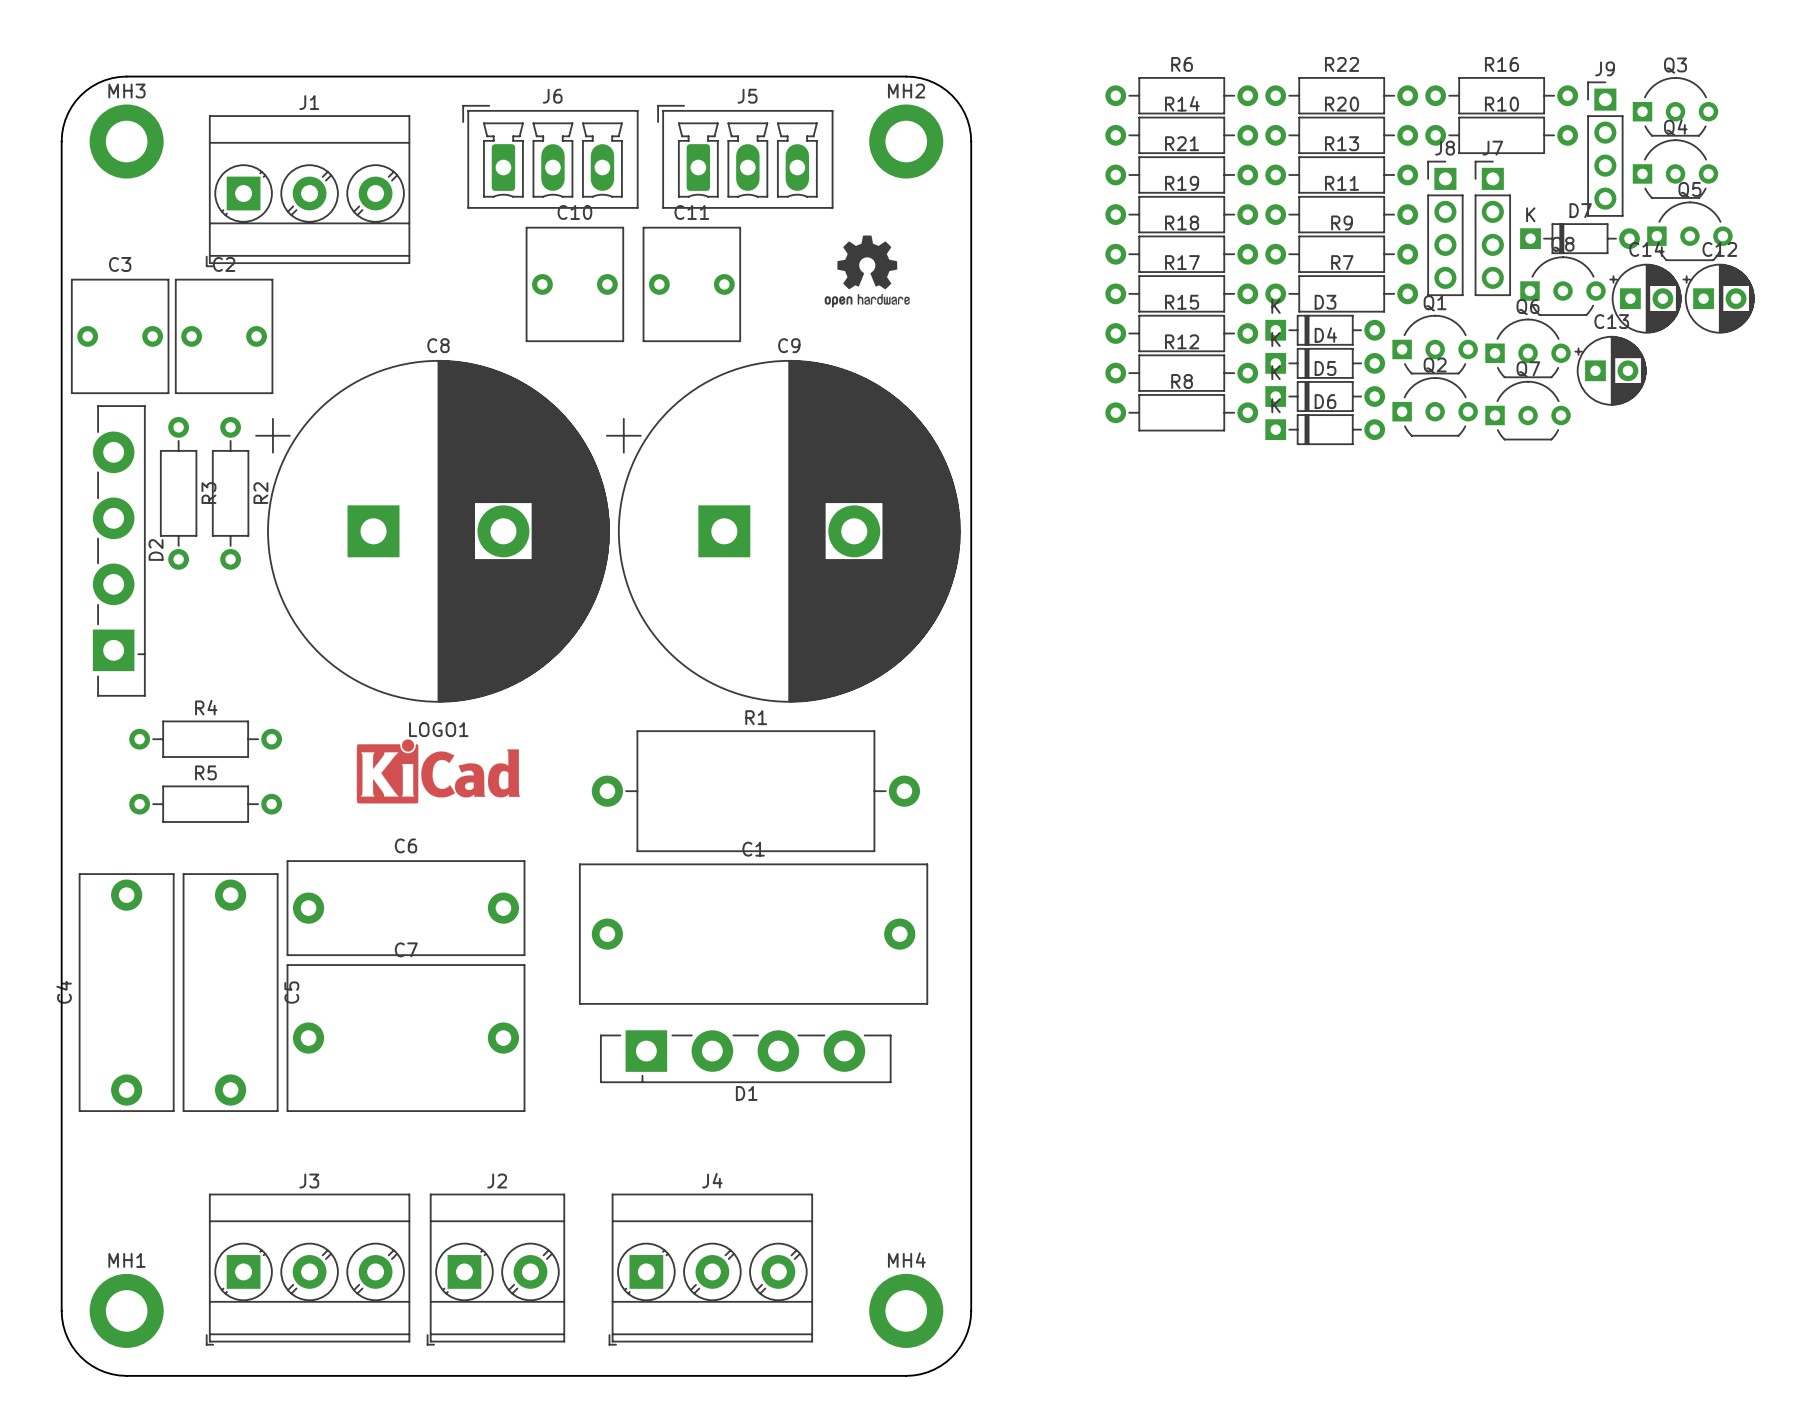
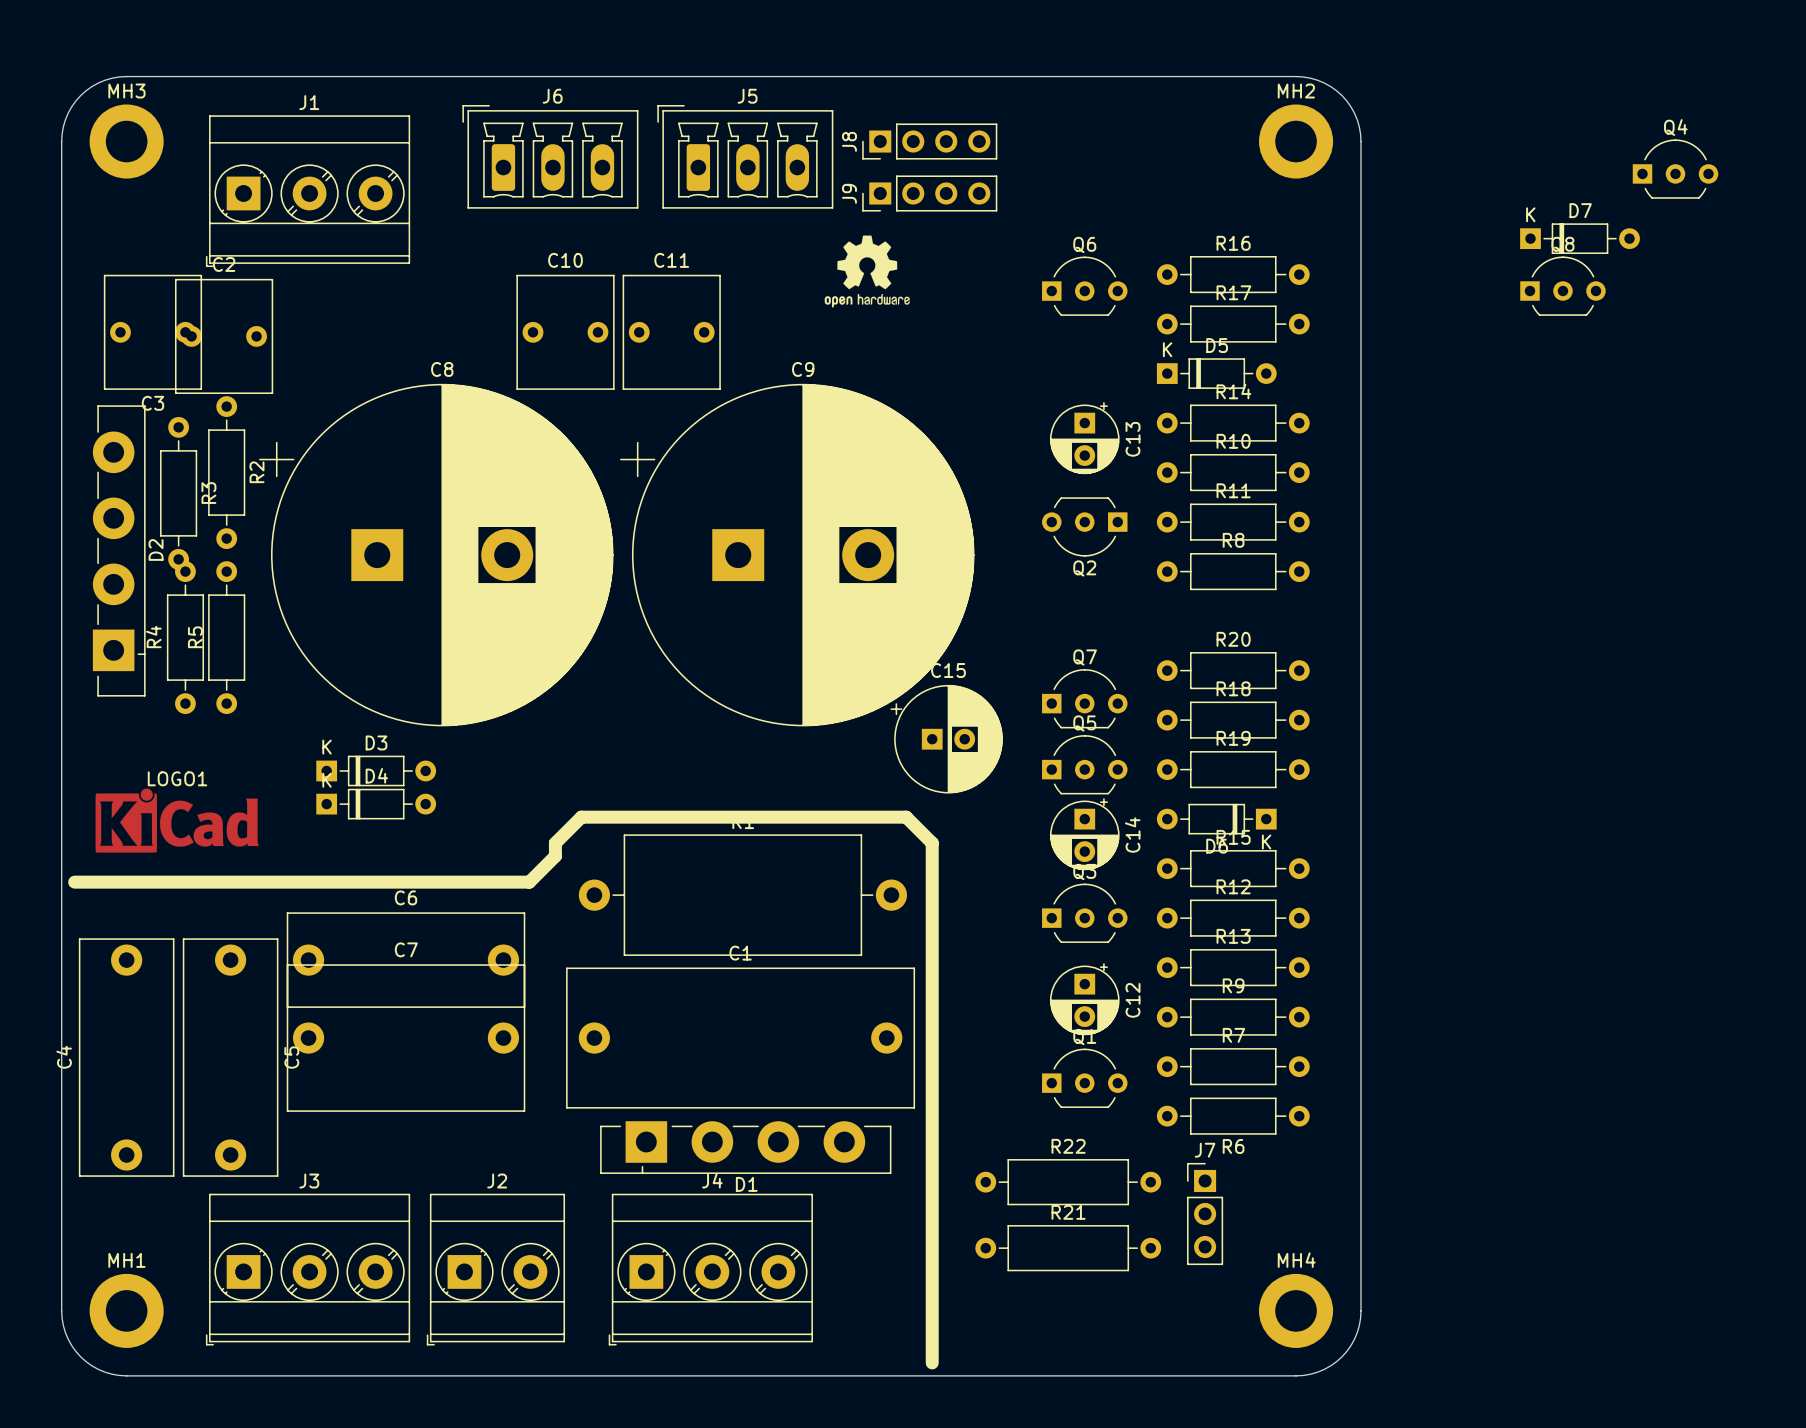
R6 name position: R6 (1182, 64) -> R6 (1233, 1146)
board edge: (906, 76) (920, 78) (934, 82) (952, 95) (961, 106) (967, 120) (971, 141) (971, 1310) (967, 1332) (961, 1345) (952, 1356) (940, 1365) (927, 1372) (906, 1375) -> (906, 76) (1303, 76) (1324, 82) (1341, 95) (1351, 106) (1357, 120) (1361, 141) (1361, 1310) (1357, 1332) (1351, 1345) (1336, 1361) (1317, 1372) (1303, 1375) (906, 1375)
R22 footprint: [1265, 77, 1419, 115] -> [975, 1159, 1162, 1206]
R6 position: (1181, 95) -> (1233, 1116)
R16 position: (1501, 95) -> (1233, 274)
Q3 position: (1675, 106) -> (1084, 913)
R14 position: (1181, 135) -> (1233, 423)
R20 position: (1341, 135) -> (1233, 670)
R10 position: (1501, 135) -> (1233, 472)
MH2 position: (906, 141) -> (1296, 141)
J9 rotation: 0° (1605, 149) -> 90° counterclockwise (929, 193)
J9 position: (1605, 149) -> (929, 193)
R21 footprint: [1105, 156, 1259, 194] -> [975, 1225, 1162, 1272]
J7 footprint: [1474, 160, 1511, 296] -> [1187, 1162, 1224, 1266]
R13 position: (1341, 174) -> (1233, 967)
R19 position: (1181, 214) -> (1233, 769)
R11 position: (1341, 214) -> (1233, 522)
J8 rotation: 0° (1445, 228) -> 90° counterclockwise (929, 141)
J8 position: (1445, 228) -> (929, 141)
Q5 position: (1689, 231) -> (1084, 764)
R18 position: (1181, 254) -> (1233, 720)
R9 position: (1341, 254) -> (1233, 1017)
C3 name position: C3 (120, 264) -> C3 (152, 403)
C10 position: (574, 284) -> (565, 332)
C11 position: (691, 284) -> (671, 332)
R17 position: (1181, 293) -> (1233, 324)
R7 position: (1341, 293) -> (1233, 1066)
C14 rotation: 0° (1645, 298) -> 90° clockwise (1084, 834)
C14 position: (1645, 298) -> (1084, 834)
C12 rotation: 0° (1718, 298) -> 90° clockwise (1084, 999)
C12 position: (1718, 298) -> (1084, 999)
D3 position: (1325, 330) -> (376, 770)
R15 position: (1181, 333) -> (1233, 868)
C3 position: (120, 336) -> (152, 332)
Q1 position: (1435, 344) -> (1084, 1078)
Q6 position: (1528, 348) -> (1084, 286)
D4 position: (1325, 363) -> (376, 804)
C13 rotation: 0° (1610, 370) -> 90° clockwise (1084, 438)
C13 position: (1610, 370) -> (1084, 438)
R12 position: (1181, 373) -> (1233, 918)
D5 position: (1325, 396) -> (1216, 373)
Q2 rotation: 0° (1435, 406) -> 180° (1084, 526)
Q2 position: (1435, 406) -> (1084, 526)
Q7 position: (1528, 410) -> (1084, 698)
R8 position: (1181, 412) -> (1233, 571)
D6 rotation: 0° (1325, 429) -> 180° (1216, 819)
D6 position: (1325, 429) -> (1216, 819)
R2 position: (230, 493) -> (226, 472)
C8 position: (432, 531) -> (436, 555)
C9 position: (783, 531) -> (797, 555)
R4 name position: R4 (206, 707) -> R4 (153, 636)
R4 rotation: 0° (205, 739) -> 90° clockwise (185, 637)
R4 position: (205, 739) -> (185, 637)
C15: none -> (946, 739)
LOGO1 position: (438, 771) -> (177, 820)
R5 name position: R5 (205, 772) -> R5 (195, 637)
R1 position: (755, 791) -> (742, 895)
R5 rotation: 0° (205, 804) -> 90° clockwise (226, 637)
R5 position: (205, 804) -> (226, 637)
line: none -> (74, 882) (529, 882) (555, 856) (555, 843) (581, 817) (906, 817) (932, 843) (932, 1362)
C6 position: (406, 908) -> (406, 960)
C1 position: (753, 934) -> (740, 1038)
C4 position: (126, 992) -> (126, 1057)
C5 position: (230, 992) -> (230, 1057)
D1 position: (745, 1056) -> (745, 1147)
MH4 position: (906, 1310) -> (1296, 1310)

